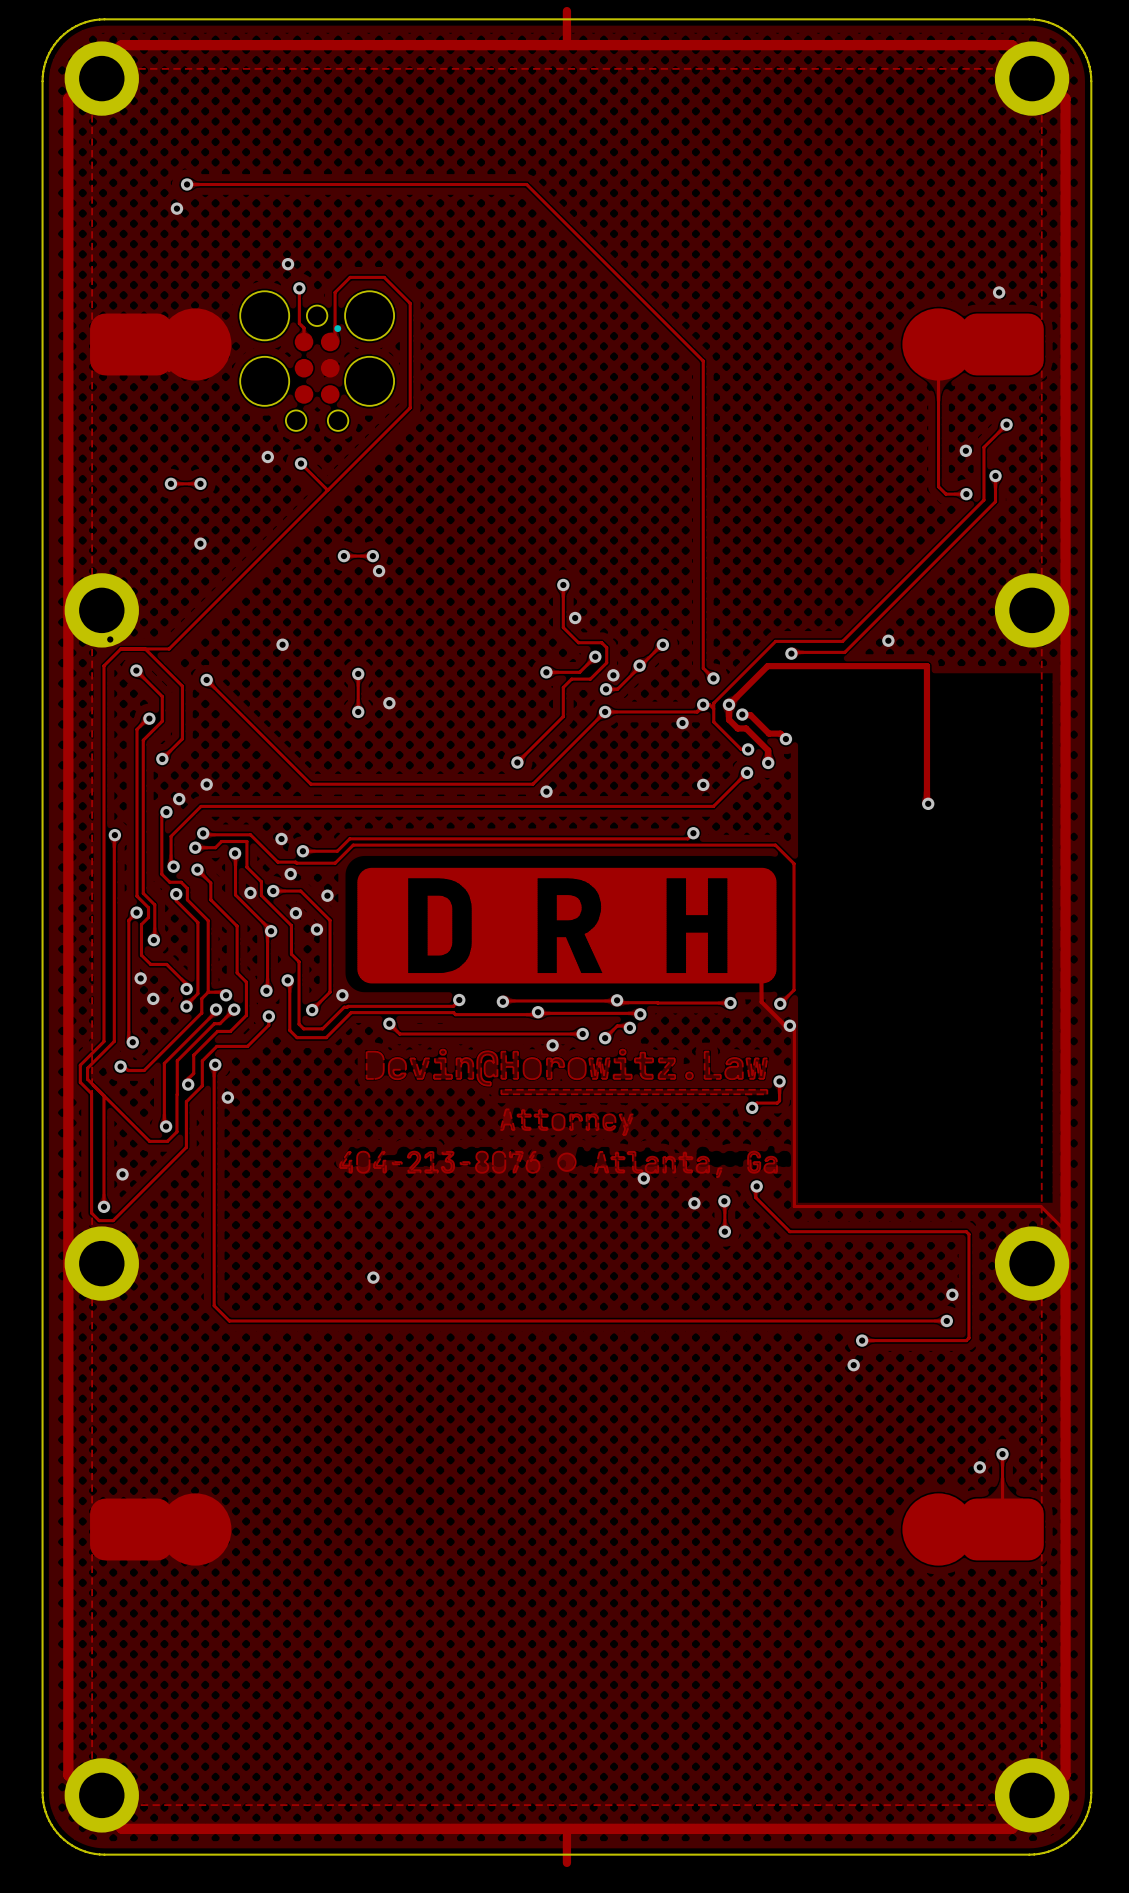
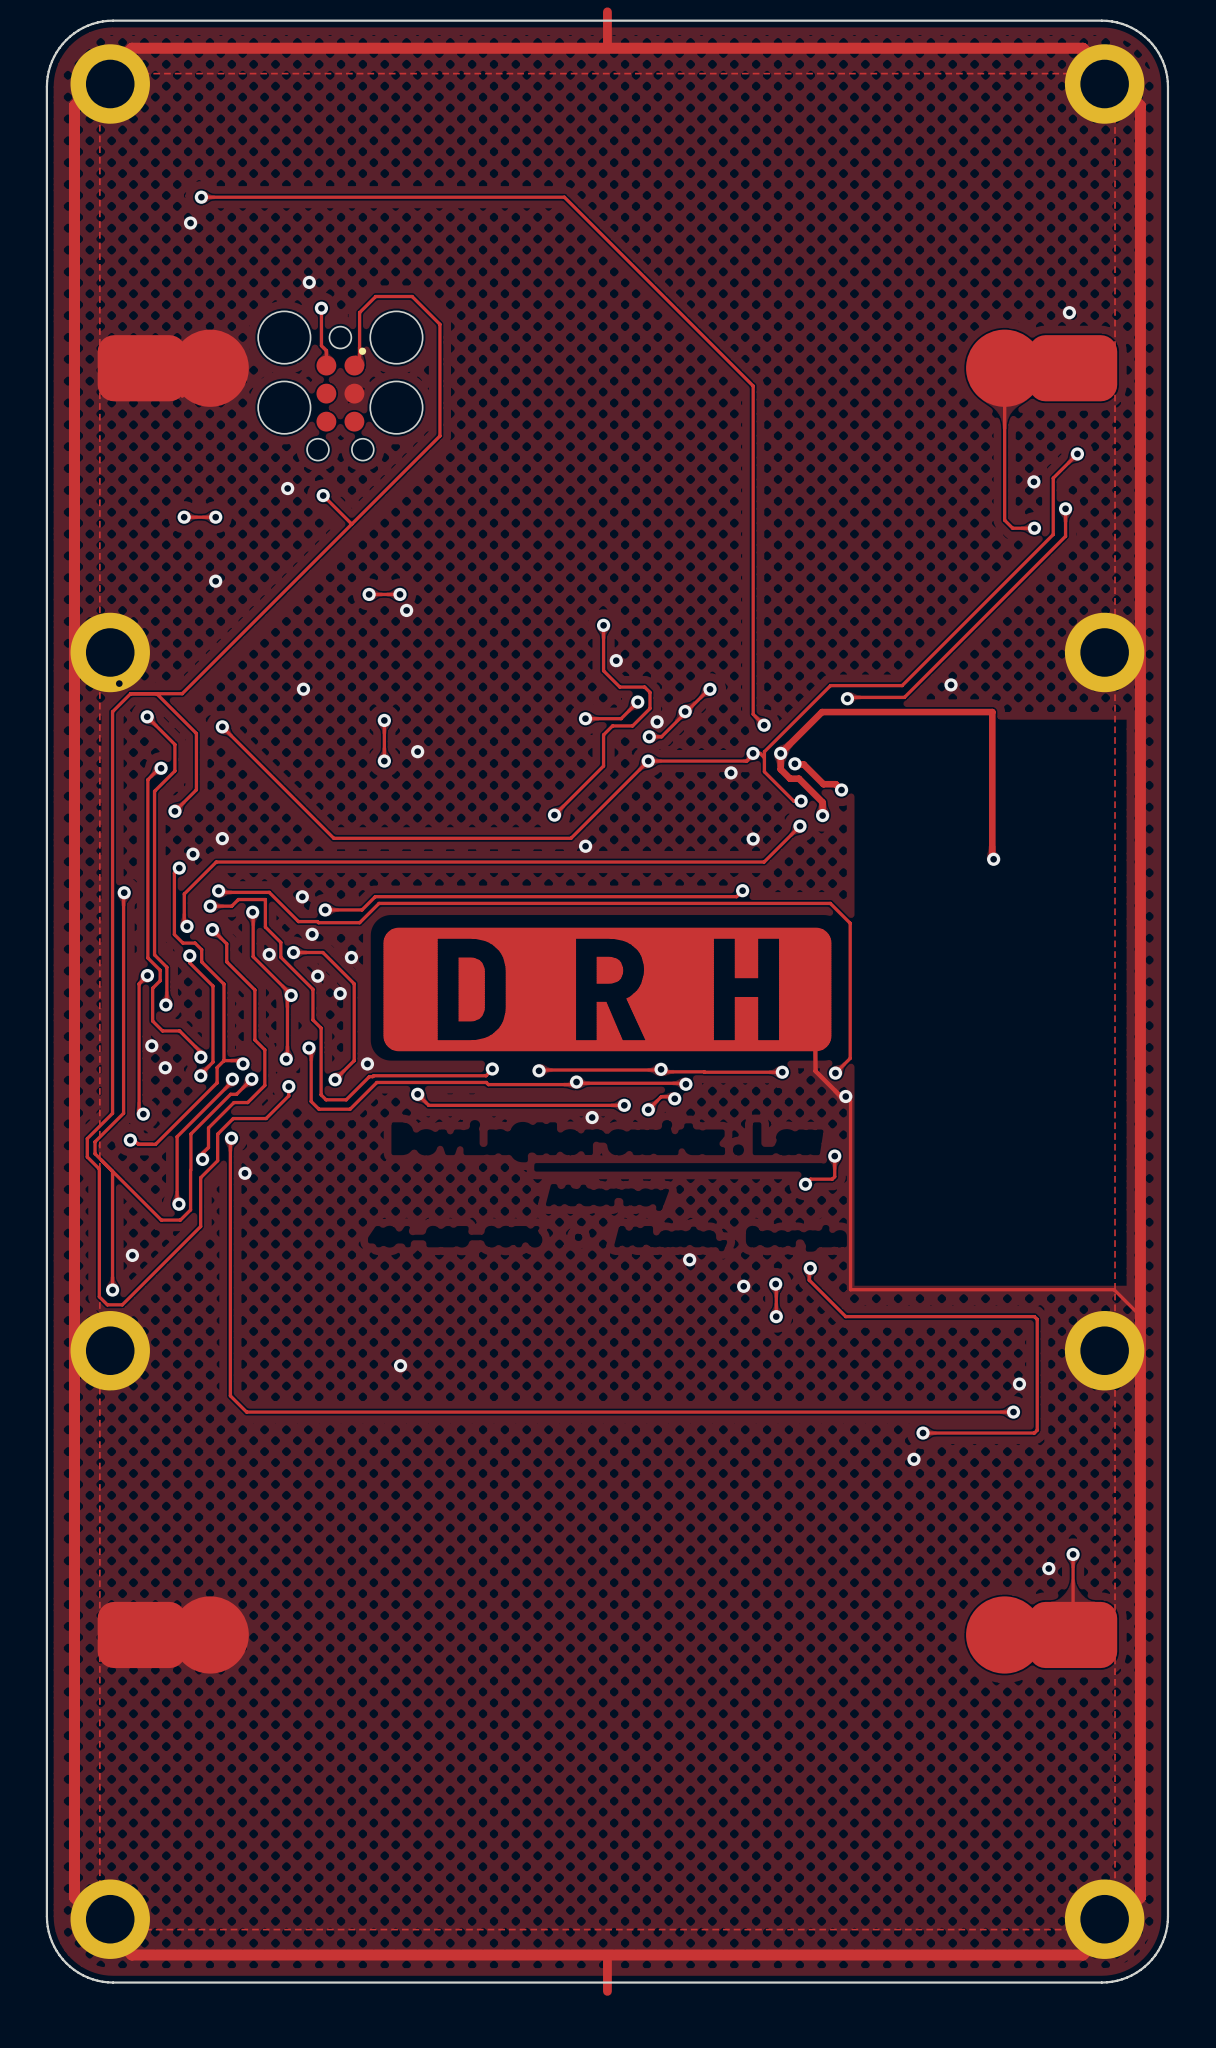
zone outline: (442, 1049) (445, 1050) (444, 1054) (440, 1053) (442, 1049) -> none
zone outline: (622, 1049) (625, 1050) (624, 1054) (620, 1053) (622, 1049) -> none
zone outline: (366, 1051) (378, 1052) (383, 1056) (383, 1071) (379, 1077) (366, 1078) (366, 1051) -> none
zone outline: (501, 1051) (506, 1051) (506, 1062) (513, 1062) (513, 1051) (518, 1051) (518, 1078) (513, 1078) (513, 1066) (506, 1066) (506, 1078) (501, 1078) (501, 1051) -> none
zone outline: (704, 1051) (709, 1051) (709, 1074) (720, 1074) (720, 1078) (704, 1078) (704, 1051) -> none
zone outline: (640, 1052) (645, 1052) (645, 1058) (653, 1058) (653, 1062) (645, 1062) (645, 1073) (652, 1074) (652, 1078) (642, 1077) (640, 1062) (634, 1062) (634, 1058) (640, 1058) (640, 1052) -> none
zone outline: (556, 1057) (562, 1060) (564, 1067) (559, 1067) (557, 1062) (553, 1062) (551, 1078) (546, 1078) (546, 1058) (551, 1058) (551, 1062) (556, 1057) -> none
zone outline: (396, 1058) (402, 1059) (405, 1064) (406, 1069) (393, 1069) (396, 1075) (405, 1073) (399, 1079) (391, 1077) (388, 1072) (389, 1061) (396, 1058) -> none
zone outline: (410, 1058) (414, 1058) (419, 1075) (424, 1058) (429, 1058) (422, 1078) (416, 1078) (410, 1058) -> none
zone outline: (434, 1058) (445, 1058) (445, 1074) (452, 1074) (452, 1078) (433, 1078) (433, 1074) (441, 1074) (441, 1062) (434, 1062) (434, 1058) -> none
zone outline: (530, 1058) (537, 1059) (540, 1064) (539, 1075) (533, 1079) (526, 1077) (523, 1072) (524, 1061) (530, 1058) -> none
zone outline: (575, 1058) (582, 1059) (585, 1064) (584, 1075) (578, 1079) (571, 1077) (568, 1072) (569, 1061) (575, 1058) -> none
zone outline: (589, 1058) (593, 1058) (595, 1075) (597, 1058) (601, 1058) (603, 1075) (606, 1058) (610, 1058) (606, 1078) (602, 1078) (599, 1061) (597, 1078) (592, 1078) (589, 1058) -> none
zone outline: (614, 1058) (625, 1058) (625, 1074) (631, 1074) (631, 1078) (613, 1078) (613, 1074) (620, 1074) (620, 1062) (614, 1062) (614, 1058) -> none
zone outline: (659, 1058) (674, 1058) (674, 1062) (664, 1074) (675, 1074) (675, 1078) (658, 1078) (658, 1074) (669, 1062) (659, 1062) (659, 1058) -> none
zone outline: (746, 1058) (750, 1058) (752, 1075) (755, 1058) (758, 1058) (761, 1075) (763, 1058) (767, 1058) (764, 1078) (759, 1078) (756, 1061) (754, 1078) (749, 1078) (746, 1058) -> none
zone outline: (493, 1060) (492, 1056) (488, 1054) (481, 1058) (481, 1078) (484, 1081) (490, 1082) (490, 1085) (483, 1084) (477, 1076) (478, 1056) (486, 1051) (491, 1051) (496, 1055) (497, 1076) (493, 1076) (493, 1074) (487, 1076) (484, 1072) (485, 1063) (489, 1060) (494, 1063) (493, 1060) -> none
zone outline: (461, 1062) (461, 1058) (456, 1058) (456, 1078) (461, 1078) (461, 1065) (464, 1062) (468, 1065) (468, 1078) (473, 1078) (471, 1060) (464, 1058) (461, 1062) -> none
zone outline: (689, 1072) (692, 1075) (689, 1079) (685, 1075) (689, 1072) -> none
zone outline: (738, 1075) (733, 1079) (725, 1076) (727, 1068) (738, 1066) (735, 1061) (726, 1064) (730, 1058) (737, 1058) (741, 1061) (742, 1078) (738, 1078) (738, 1075) -> none
zone outline: (501, 1089) (501, 1094) (767, 1094) (767, 1089) (501, 1089) -> none
zone outline: (505, 1109) (500, 1130) (503, 1130) (504, 1124) (510, 1124) (512, 1130) (514, 1130) (509, 1109) (505, 1109) -> none
zone outline: (557, 1114) (562, 1115) (564, 1119) (563, 1127) (559, 1130) (554, 1129) (552, 1125) (553, 1116) (557, 1114) -> none
zone outline: (590, 1114) (594, 1114) (597, 1116) (598, 1130) (595, 1130) (595, 1117) -> none
zone outline: (619, 1114) (622, 1114) (626, 1126) (630, 1114) (633, 1114) (625, 1135) (622, 1135) (625, 1129) (619, 1114) -> none
zone outline: (573, 1117) (578, 1117) -> none
zone outline: (573, 1117) (572, 1130) (570, 1130) (570, 1114) (572, 1114) (572, 1117) (575, 1114) (579, 1114) (582, 1120) (579, 1120) (578, 1117) -> none
zone outline: (589, 1117) (589, 1114) (586, 1114) (586, 1130) (589, 1130) (589, 1117) -> none
zone outline: (590, 1117) (594, 1117) -> none
zone outline: (606, 1126) (605, 1122) (615, 1122) (612, 1114) (604, 1116) (603, 1125) (608, 1130) (615, 1127) (607, 1127) -> none
zone outline: (525, 1127) (524, 1116) (530, 1116) (530, 1114) (524, 1114) (524, 1110) (522, 1110) (522, 1114) (517, 1114) (517, 1116) (522, 1116) (522, 1128) -> none
zone outline: (526, 1127) (530, 1127) (530, 1130) (523, 1129) -> none
zone outline: (542, 1127) (541, 1116) (547, 1116) (547, 1114) (541, 1114) (541, 1110) (539, 1110) (539, 1114) (534, 1114) (534, 1116) (539, 1116) (539, 1128) -> none
zone outline: (543, 1127) (547, 1127) (547, 1130) (540, 1129) -> none
zone outline: (348, 1151) (351, 1151) (342, 1165) (349, 1165) (349, 1160) (352, 1160) (352, 1172) (349, 1172) (349, 1168) (340, 1168) (340, 1164) (348, 1151) -> none
zone outline: (362, 1151) (367, 1152) (369, 1156) (369, 1169) (364, 1172) (359, 1171) (357, 1167) (357, 1155) (362, 1151) -> none
zone outline: (382, 1151) (385, 1151) (376, 1165) (383, 1165) (383, 1160) (385, 1160) (385, 1172) (383, 1172) (383, 1168) (374, 1168) (374, 1164) (382, 1151) -> none
zone outline: (429, 1151) (433, 1151) (433, 1170) (437, 1170) (437, 1172) (425, 1172) (425, 1170) (430, 1170) (430, 1154) (425, 1158) (425, 1155) (429, 1151) -> none
zone outline: (498, 1151) (503, 1152) (505, 1156) (504, 1169) (499, 1172) (495, 1171) (492, 1167) (493, 1155) (498, 1151) -> none
zone outline: (509, 1151) (522, 1151) (515, 1172) (512, 1172) (520, 1154) (512, 1154) (512, 1157) (509, 1157) (509, 1151) -> none
zone outline: (599, 1151) (603, 1151) (608, 1172) (605, 1172) (604, 1167) (598, 1167) (596, 1172) (594, 1172) (599, 1151) -> none
zone outline: (565, 1153) (571, 1154) (575, 1160) (574, 1167) (568, 1170) (562, 1169) (558, 1163) (559, 1157) (565, 1153) -> none
zone outline: (411, 1154) (416, 1154) -> none
zone outline: (751, 1154) (756, 1154) -> none
zone outline: (411, 1155) (410, 1157) (407, 1157) (411, 1152) (419, 1154) (419, 1161) (411, 1170) (420, 1170) (420, 1172) (408, 1172) (417, 1160) (417, 1155) -> none
zone outline: (751, 1155) (751, 1169) -> none
zone outline: (756, 1155) (757, 1157) (760, 1157) (758, 1152) (751, 1152) (748, 1157) (748, 1169) (751, 1172) (759, 1170) (760, 1162) (753, 1162) (753, 1164) (757, 1164) (756, 1169) -> none
zone outline: (667, 1157) (671, 1156) (674, 1159) (675, 1172) (672, 1172) (671, 1160) -> none
zone outline: (448, 1159) (453, 1151) (442, 1151) (442, 1154) (450, 1154) (445, 1159) (445, 1161) (450, 1162) -> none
zone outline: (448, 1159) (453, 1162) (453, 1169) (446, 1172) (442, 1170) (441, 1166) (444, 1166) (444, 1169) -> none
zone outline: (477, 1159) (477, 1154) (482, 1151) (487, 1154) (487, 1159) -> none
zone outline: (477, 1159) (479, 1161) (476, 1164) (476, 1169) (482, 1172) (488, 1169) (487, 1164) (484, 1161) (486, 1159) -> none
zone outline: (665, 1159) (665, 1156) (663, 1156) (663, 1172) (665, 1172) (666, 1160) -> none
zone outline: (667, 1159) (671, 1159) -> none
zone outline: (530, 1161) (536, 1151) (533, 1151) (526, 1166) (529, 1171) (536, 1171) (539, 1167) (538, 1162) (534, 1159) (530, 1161) -> none
zone outline: (392, 1162) (401, 1162) (401, 1164) (392, 1164) (392, 1162) -> none
zone outline: (450, 1162) (450, 1169) -> none
zone outline: (460, 1162) (469, 1162) (469, 1164) (460, 1164) (460, 1162) -> none
zone outline: (718, 1168) (722, 1168) (718, 1177) (716, 1177) (718, 1168) -> none
zone outline: (445, 1169) (450, 1169) -> none
zone outline: (635, 1169) (635, 1151) (627, 1151) (627, 1154) (632, 1154) (633, 1170) (642, 1172) (642, 1170) (636, 1169) -> none
zone outline: (706, 1169) (706, 1172) (709, 1172) (708, 1159) (705, 1156) (699, 1157) (697, 1161) (703, 1158) (706, 1163) (698, 1164) (696, 1169) (700, 1172) (705, 1171) -> none
zone outline: (751, 1169) (756, 1169) -> none
zone outline: (619, 1170) (618, 1159) (624, 1159) (624, 1156) (618, 1156) (618, 1152) (615, 1152) (615, 1156) (611, 1156) (611, 1159) (615, 1159) (616, 1171) -> none
zone outline: (620, 1170) (624, 1170) (624, 1172) (617, 1171) -> none
zone outline: (687, 1170) (686, 1159) (692, 1159) (692, 1156) (686, 1156) (686, 1152) (683, 1152) (683, 1156) (679, 1156) (679, 1159) (683, 1159) (684, 1171) -> none
zone outline: (687, 1170) (692, 1170) (692, 1172) (685, 1171) -> none
zone outline: (654, 1171) (655, 1169) (655, 1172) (658, 1172) (657, 1160) (655, 1157) (649, 1157) (646, 1161) (653, 1158) (655, 1163) (647, 1164) (645, 1169) (649, 1172) (654, 1172) -> none
zone outline: (773, 1171) (774, 1169) (774, 1172) (776, 1172) (776, 1160) (774, 1157) (768, 1157) (765, 1161) (771, 1158) (774, 1163) (766, 1164) (764, 1169) (767, 1172) (772, 1172) -> none

